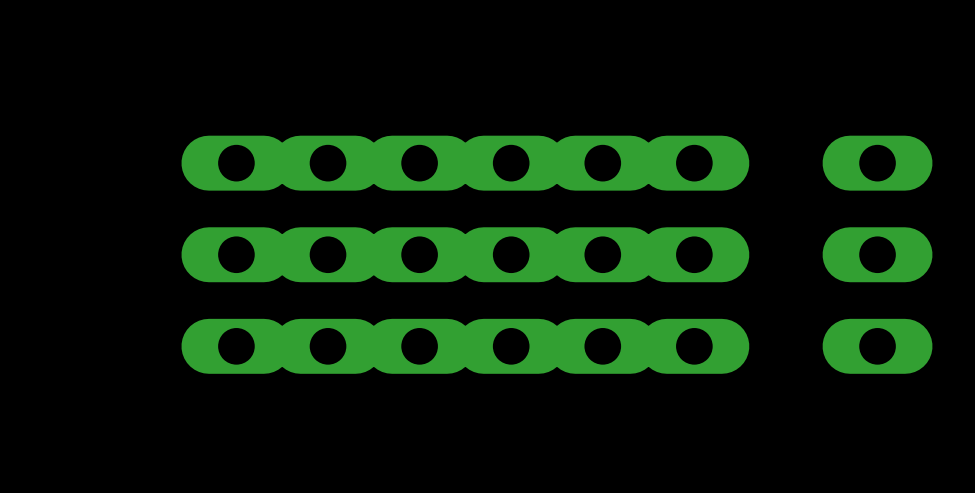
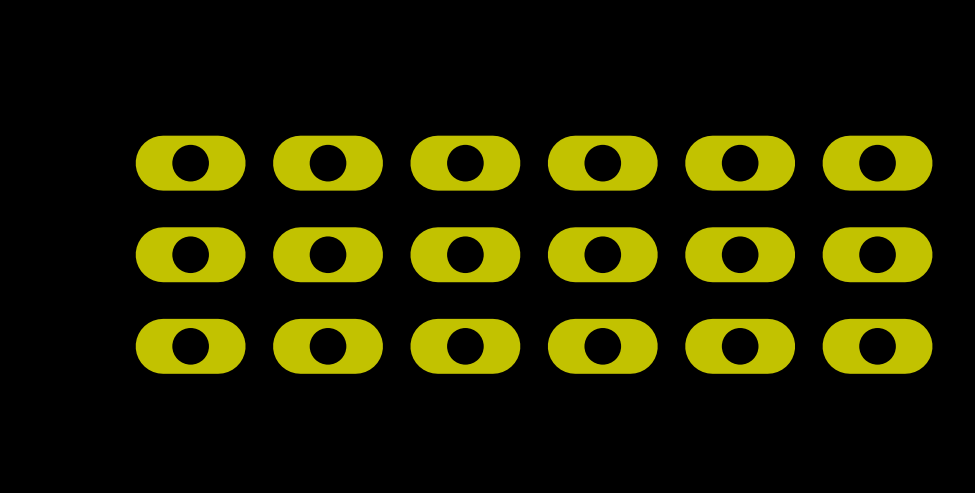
part position: (236, 254) -> (190, 254)
part: (419, 254) -> none
part: none -> (465, 254)
part: (511, 254) -> none
part position: (694, 254) -> (740, 254)

